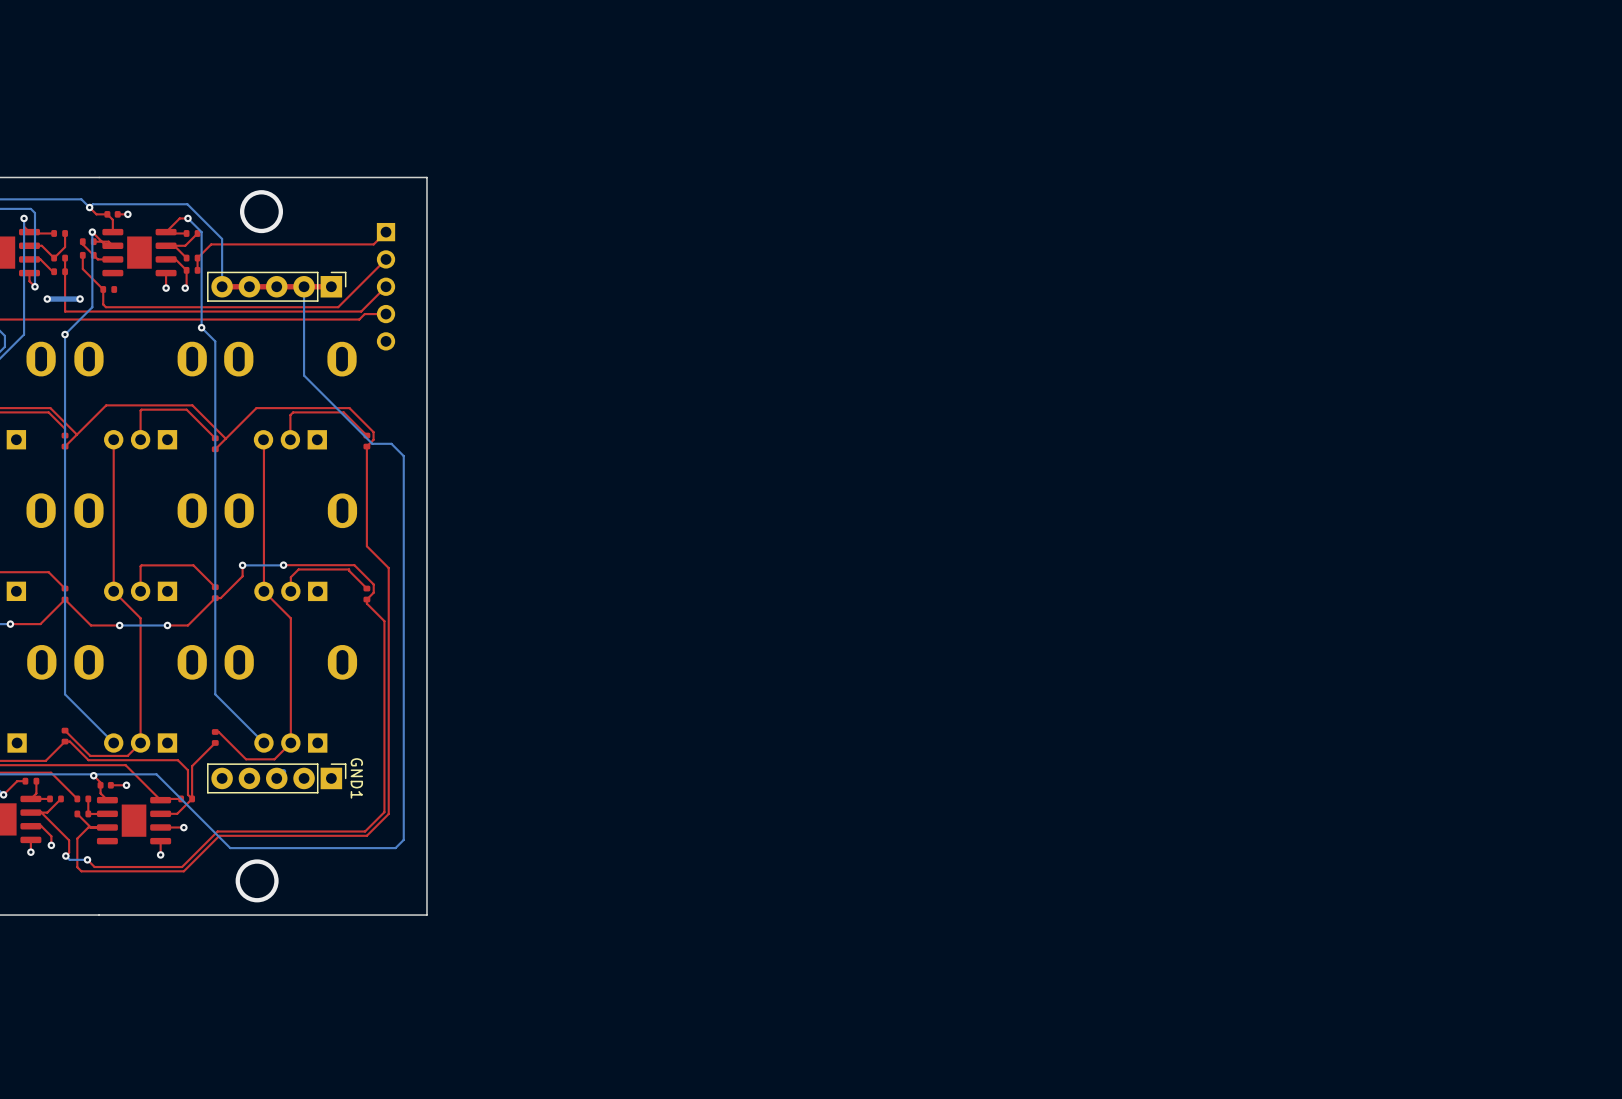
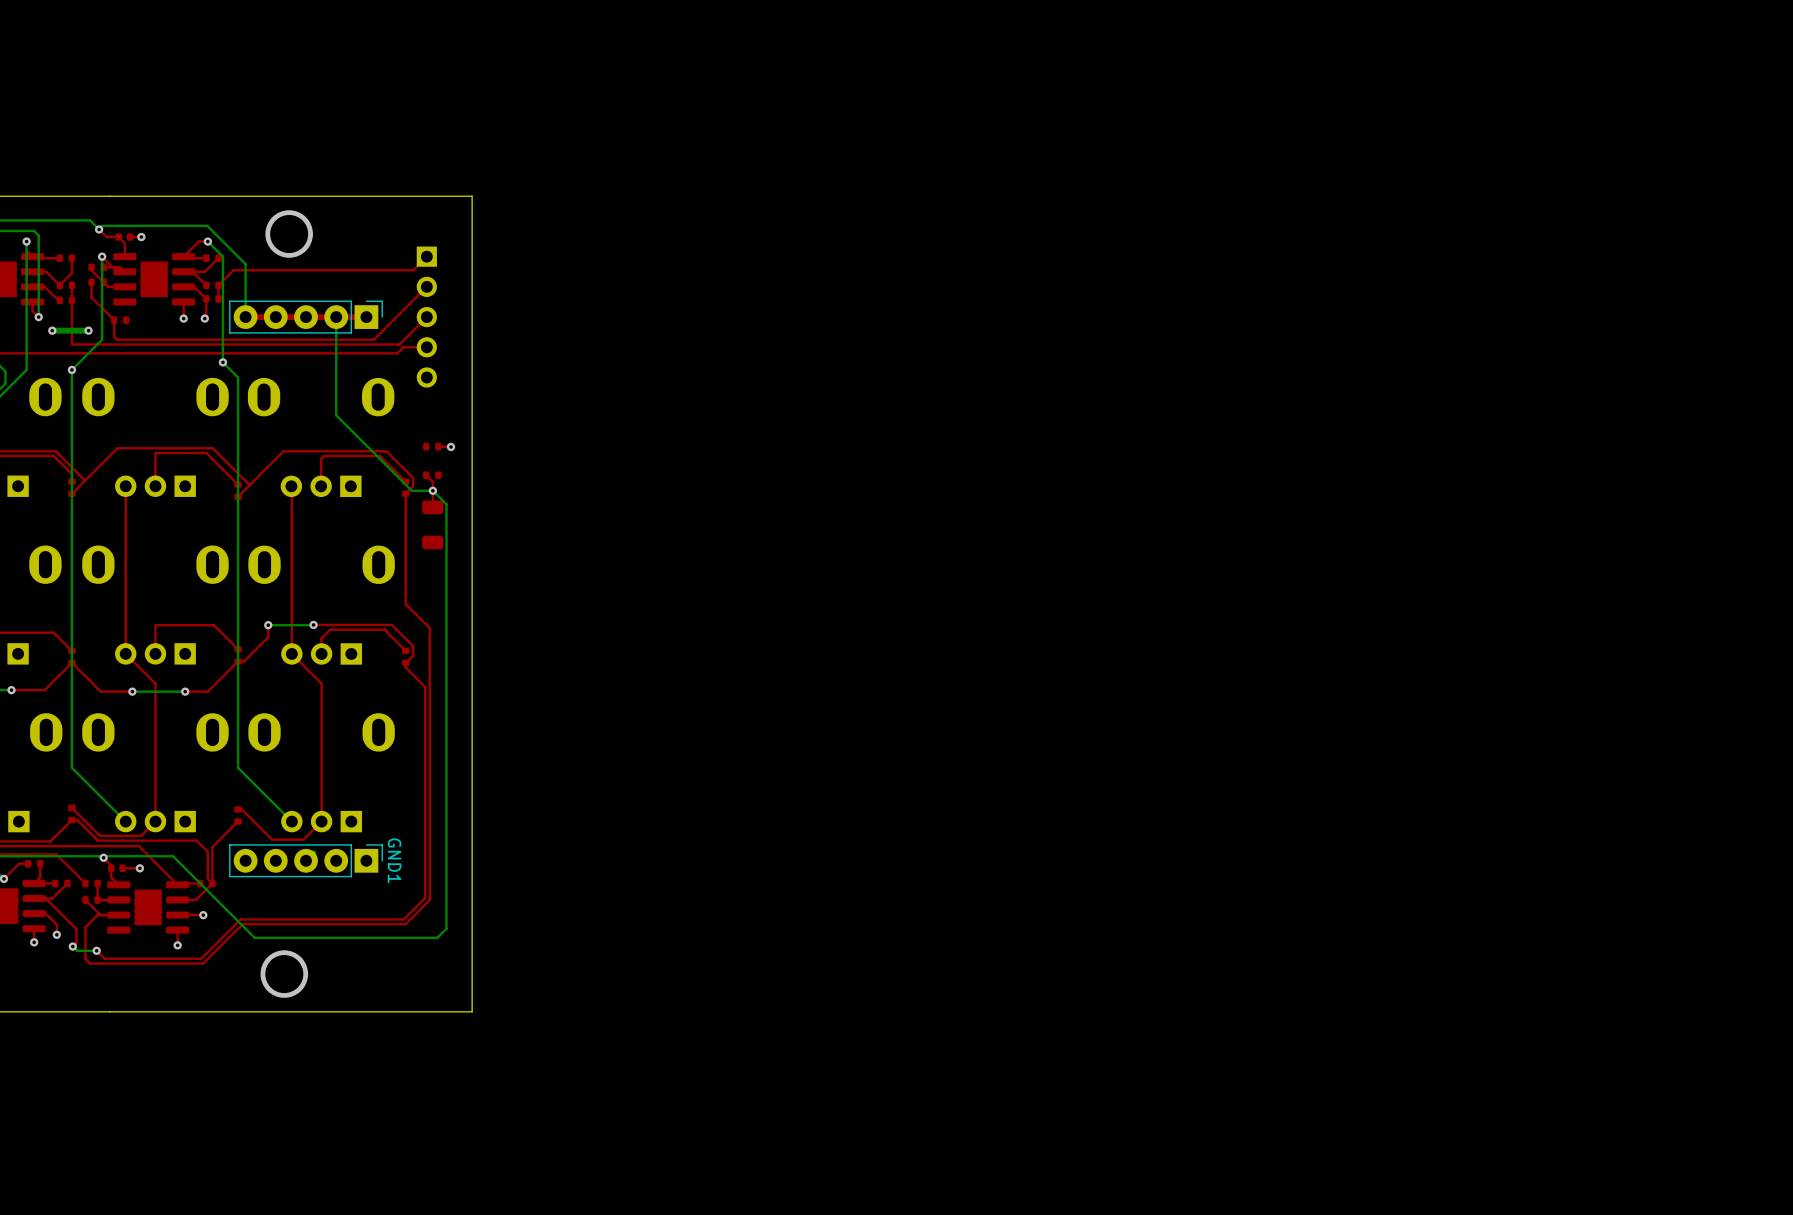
part: none -> (432, 446)
top track: none -> (438, 446) (451, 446)
via: none -> (451, 446)
top track: none -> (426, 475) (432, 481) (432, 507)
part: none -> (432, 475)
via: none -> (432, 490)
part: none -> (432, 524)

